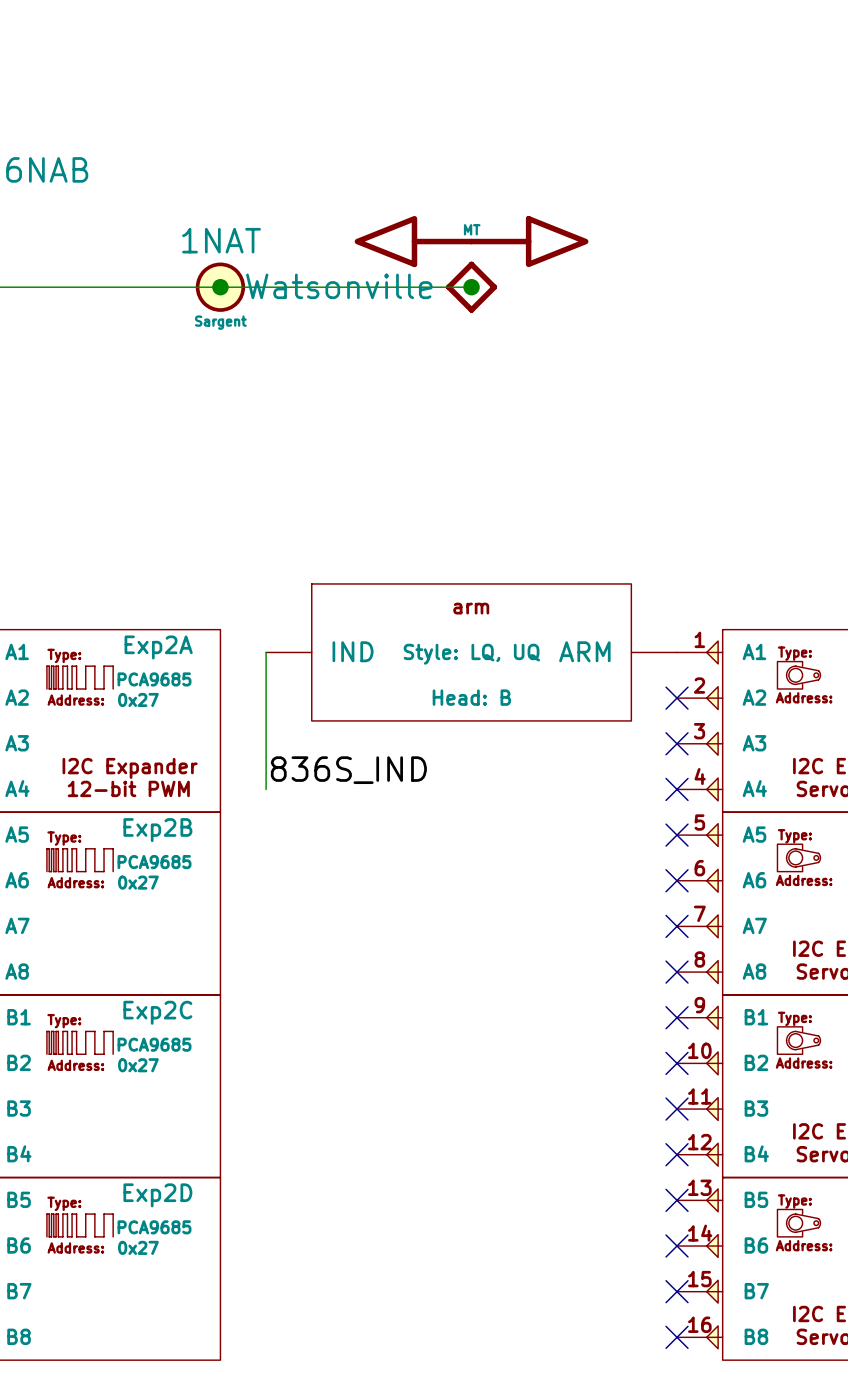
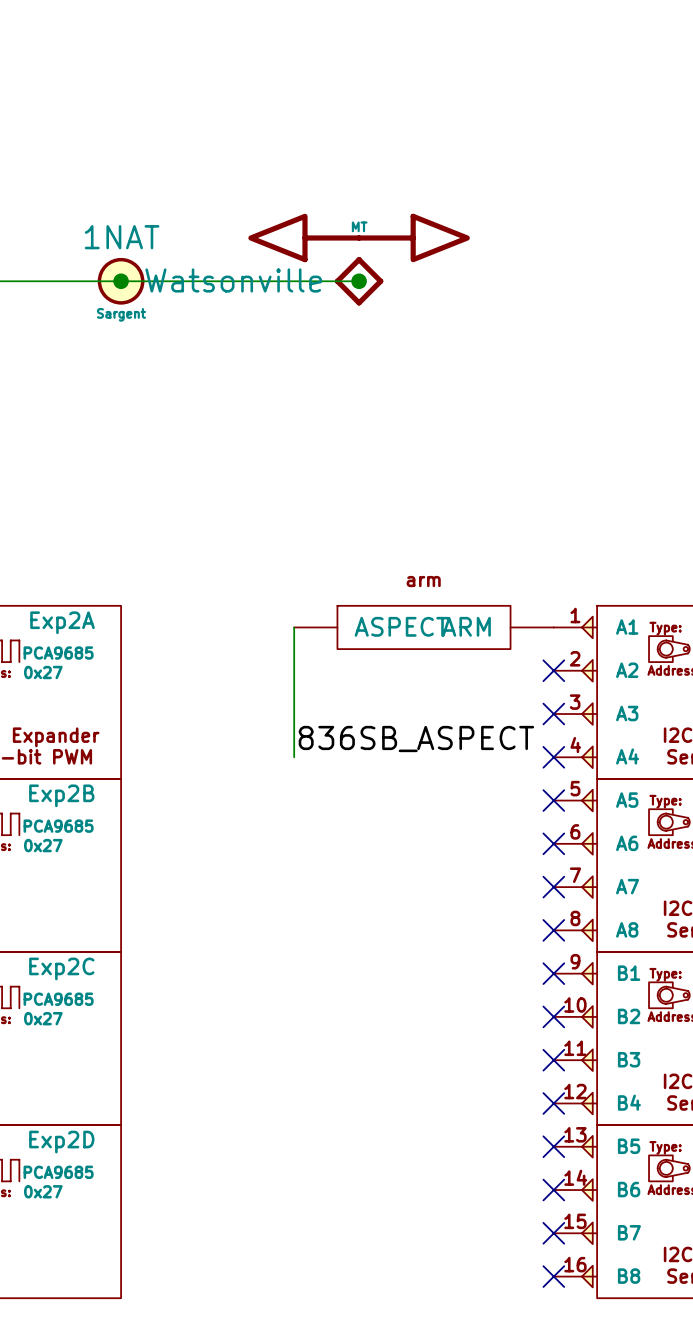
wire: (266, 652) (266, 789) -> (294, 627) (294, 757)
part: (471, 652) -> none
part: none -> (423, 627)
label: 836S_IND (348, 770) -> none
label: none -> 836SB_ASPECT (416, 739)

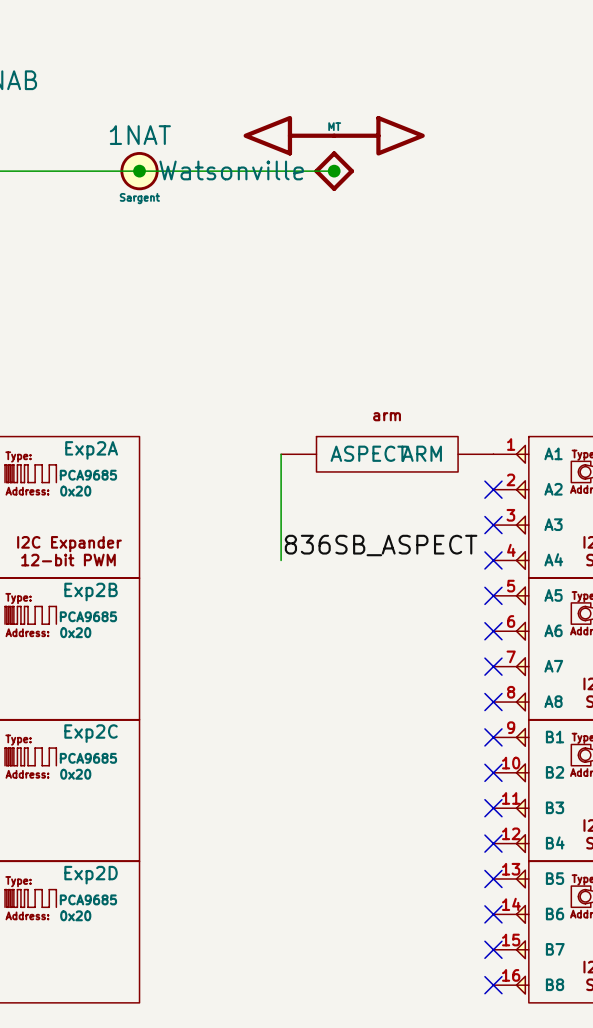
Exp2A value: 0x27 (43, 672) -> 0x20 (75, 491)
Exp2B value: 0x27 (43, 845) -> 0x20 (75, 632)
Exp2C value: 0x27 (43, 1018) -> 0x20 (75, 774)
Exp2D value: 0x27 (43, 1191) -> 0x20 (75, 915)

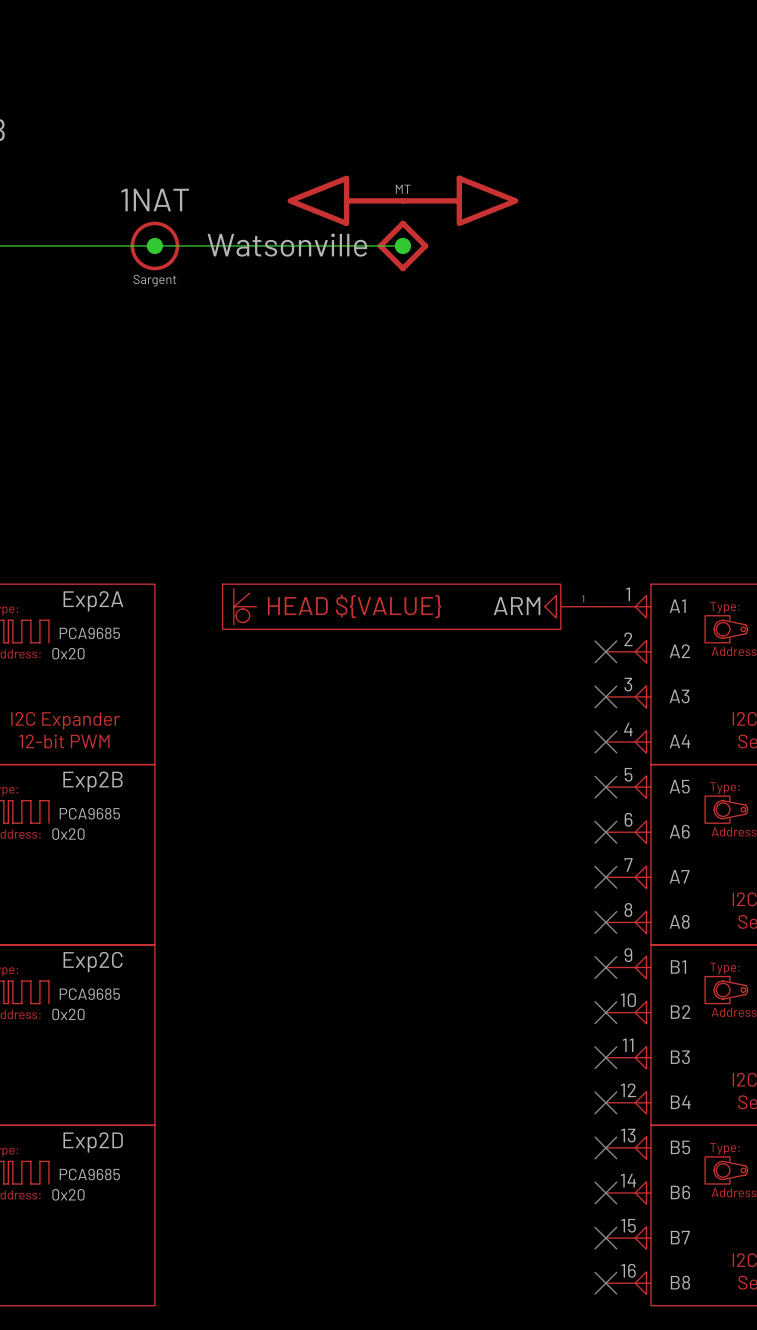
wire: (281, 454) (281, 560) -> none
part: none -> (414, 606)
part: (387, 454) -> none
label: 836SB_ASPECT (381, 545) -> none

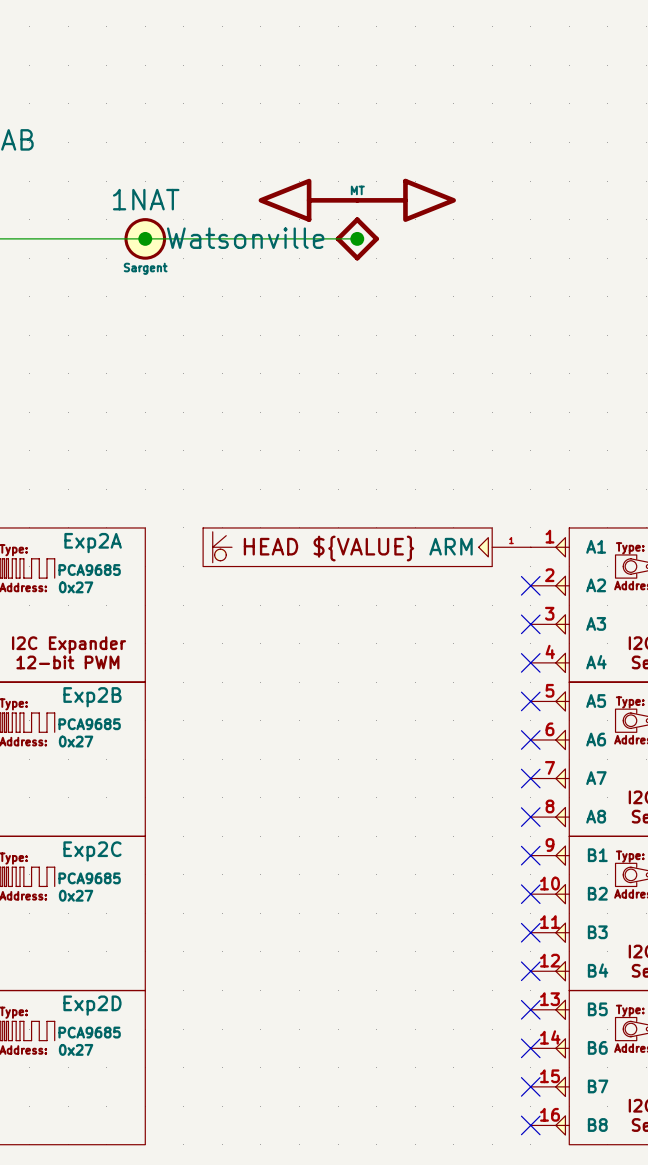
Exp2A value: 0x20 (68, 653) -> 0x27 (76, 587)
Exp2B value: 0x20 (68, 834) -> 0x27 (76, 741)
Exp2C value: 0x20 (68, 1014) -> 0x27 (76, 895)
Exp2D value: 0x20 (68, 1194) -> 0x27 (76, 1049)

